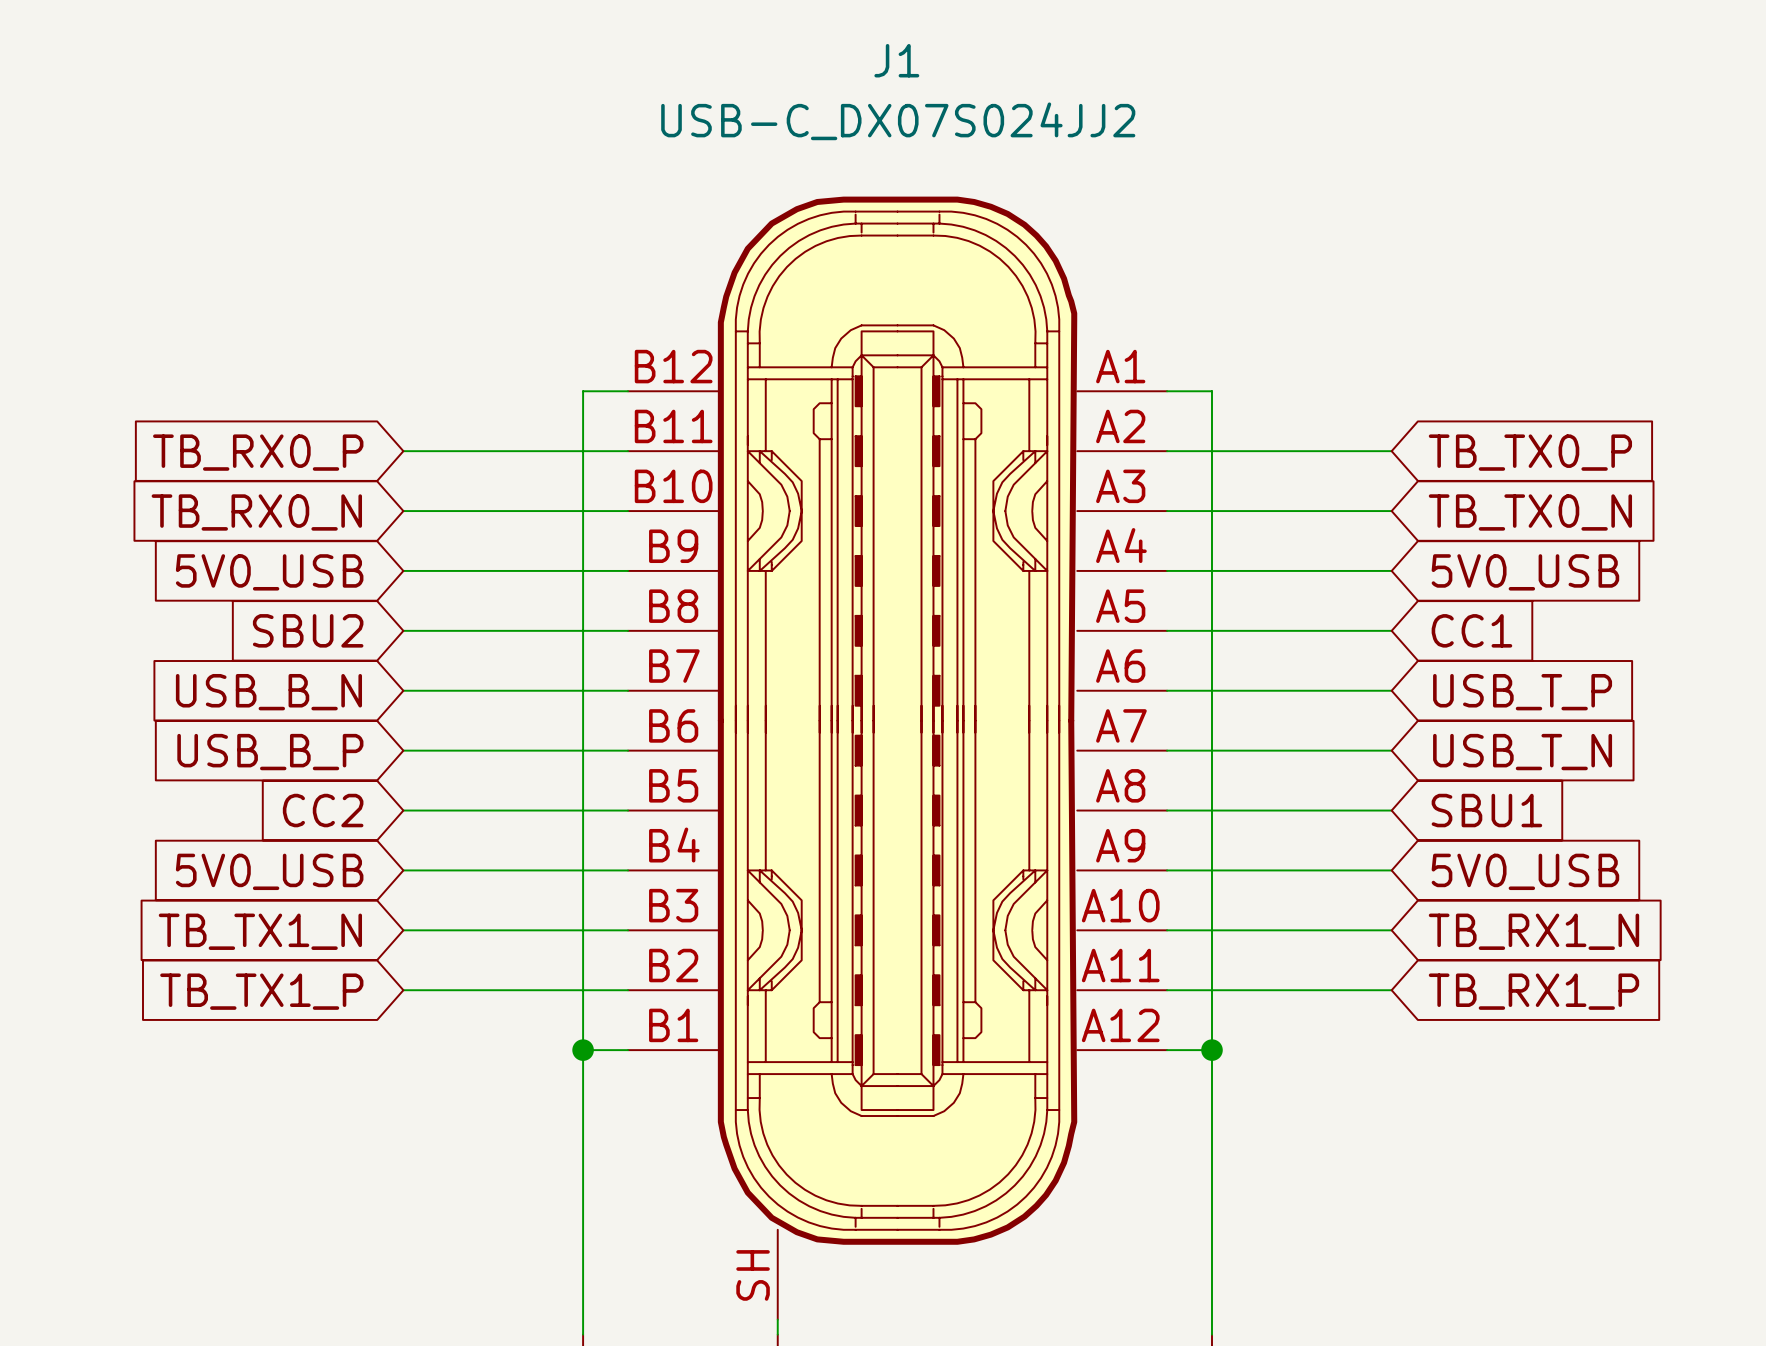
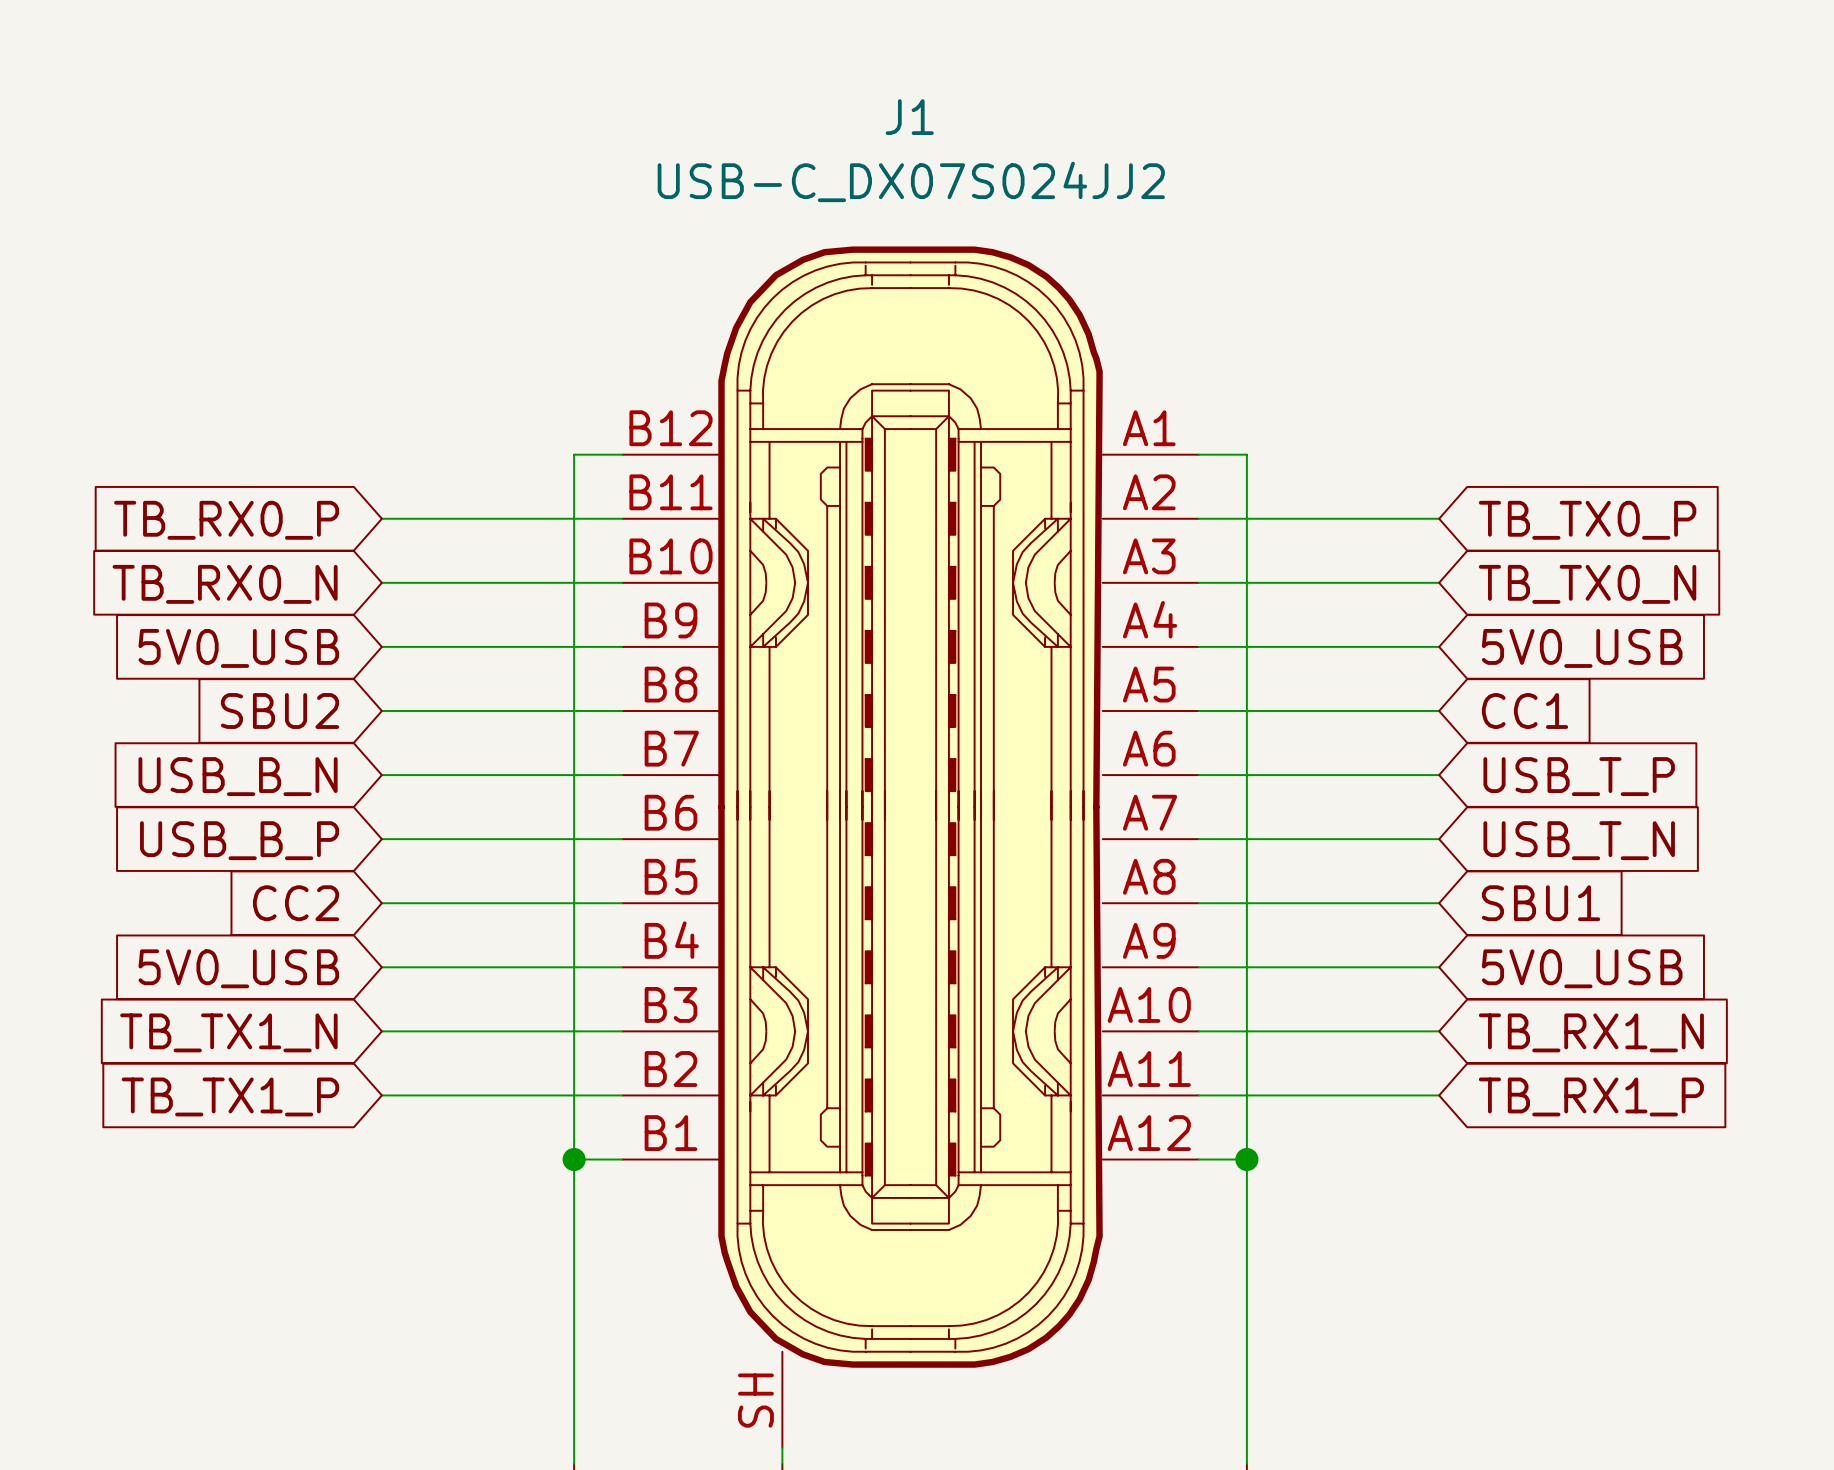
J1 name position: J1 (896, 60) -> J1 (909, 117)
J1 value position: USB-C_DX07S024JJ2 (898, 121) -> USB-C_DX07S024JJ2 (911, 181)

